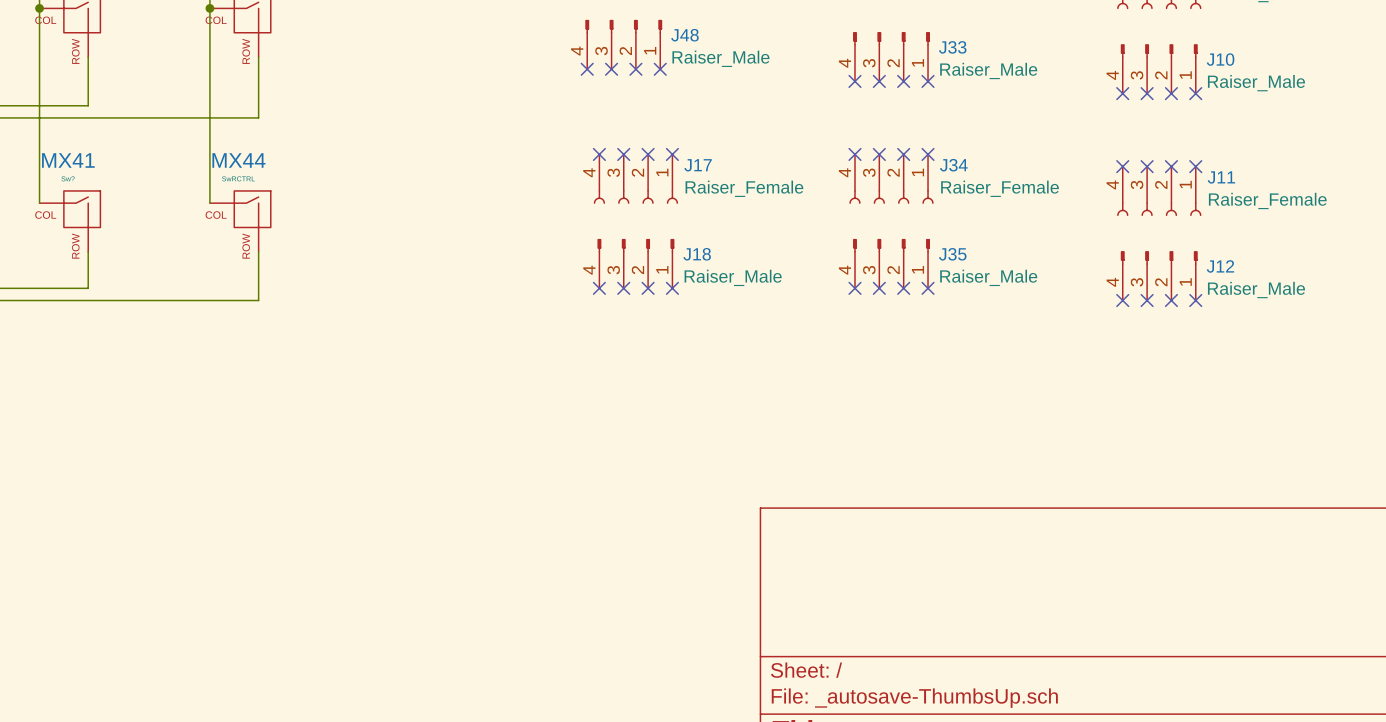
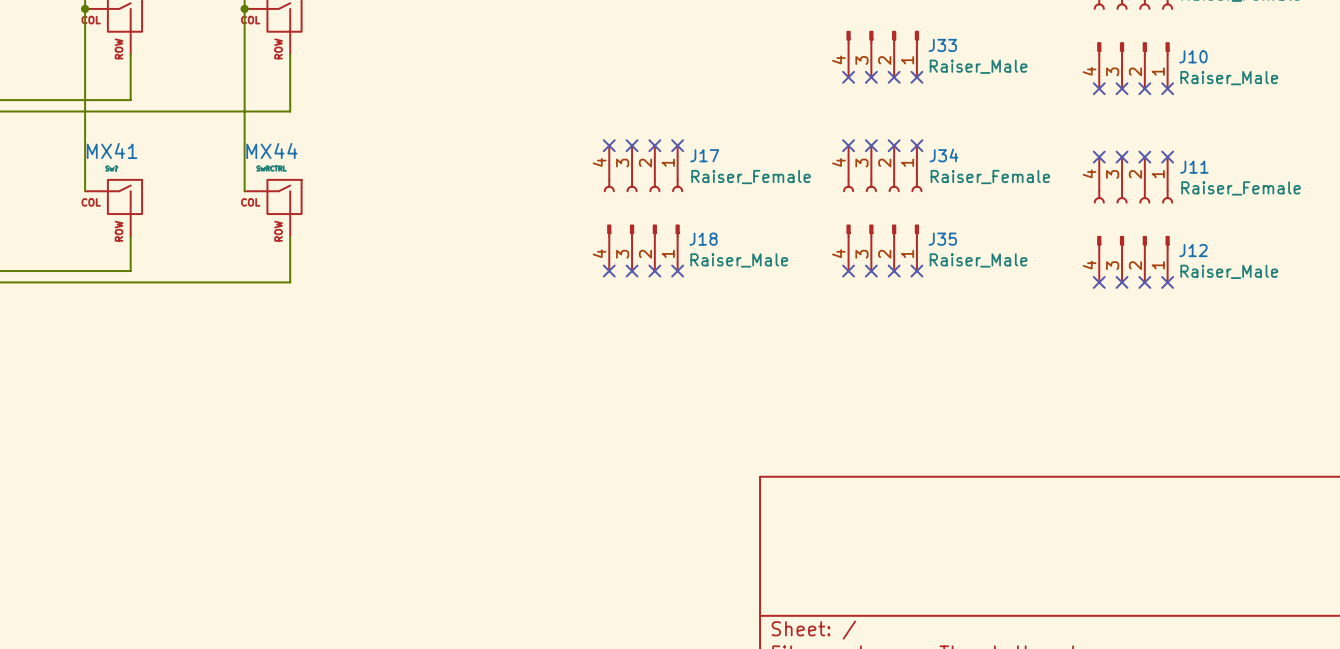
J48: Raiser_Male (623, 44) -> none
no-connect mark: (587, 69) -> none
no-connect mark: (611, 69) -> none
no-connect mark: (635, 69) -> none
no-connect mark: (660, 69) -> none

